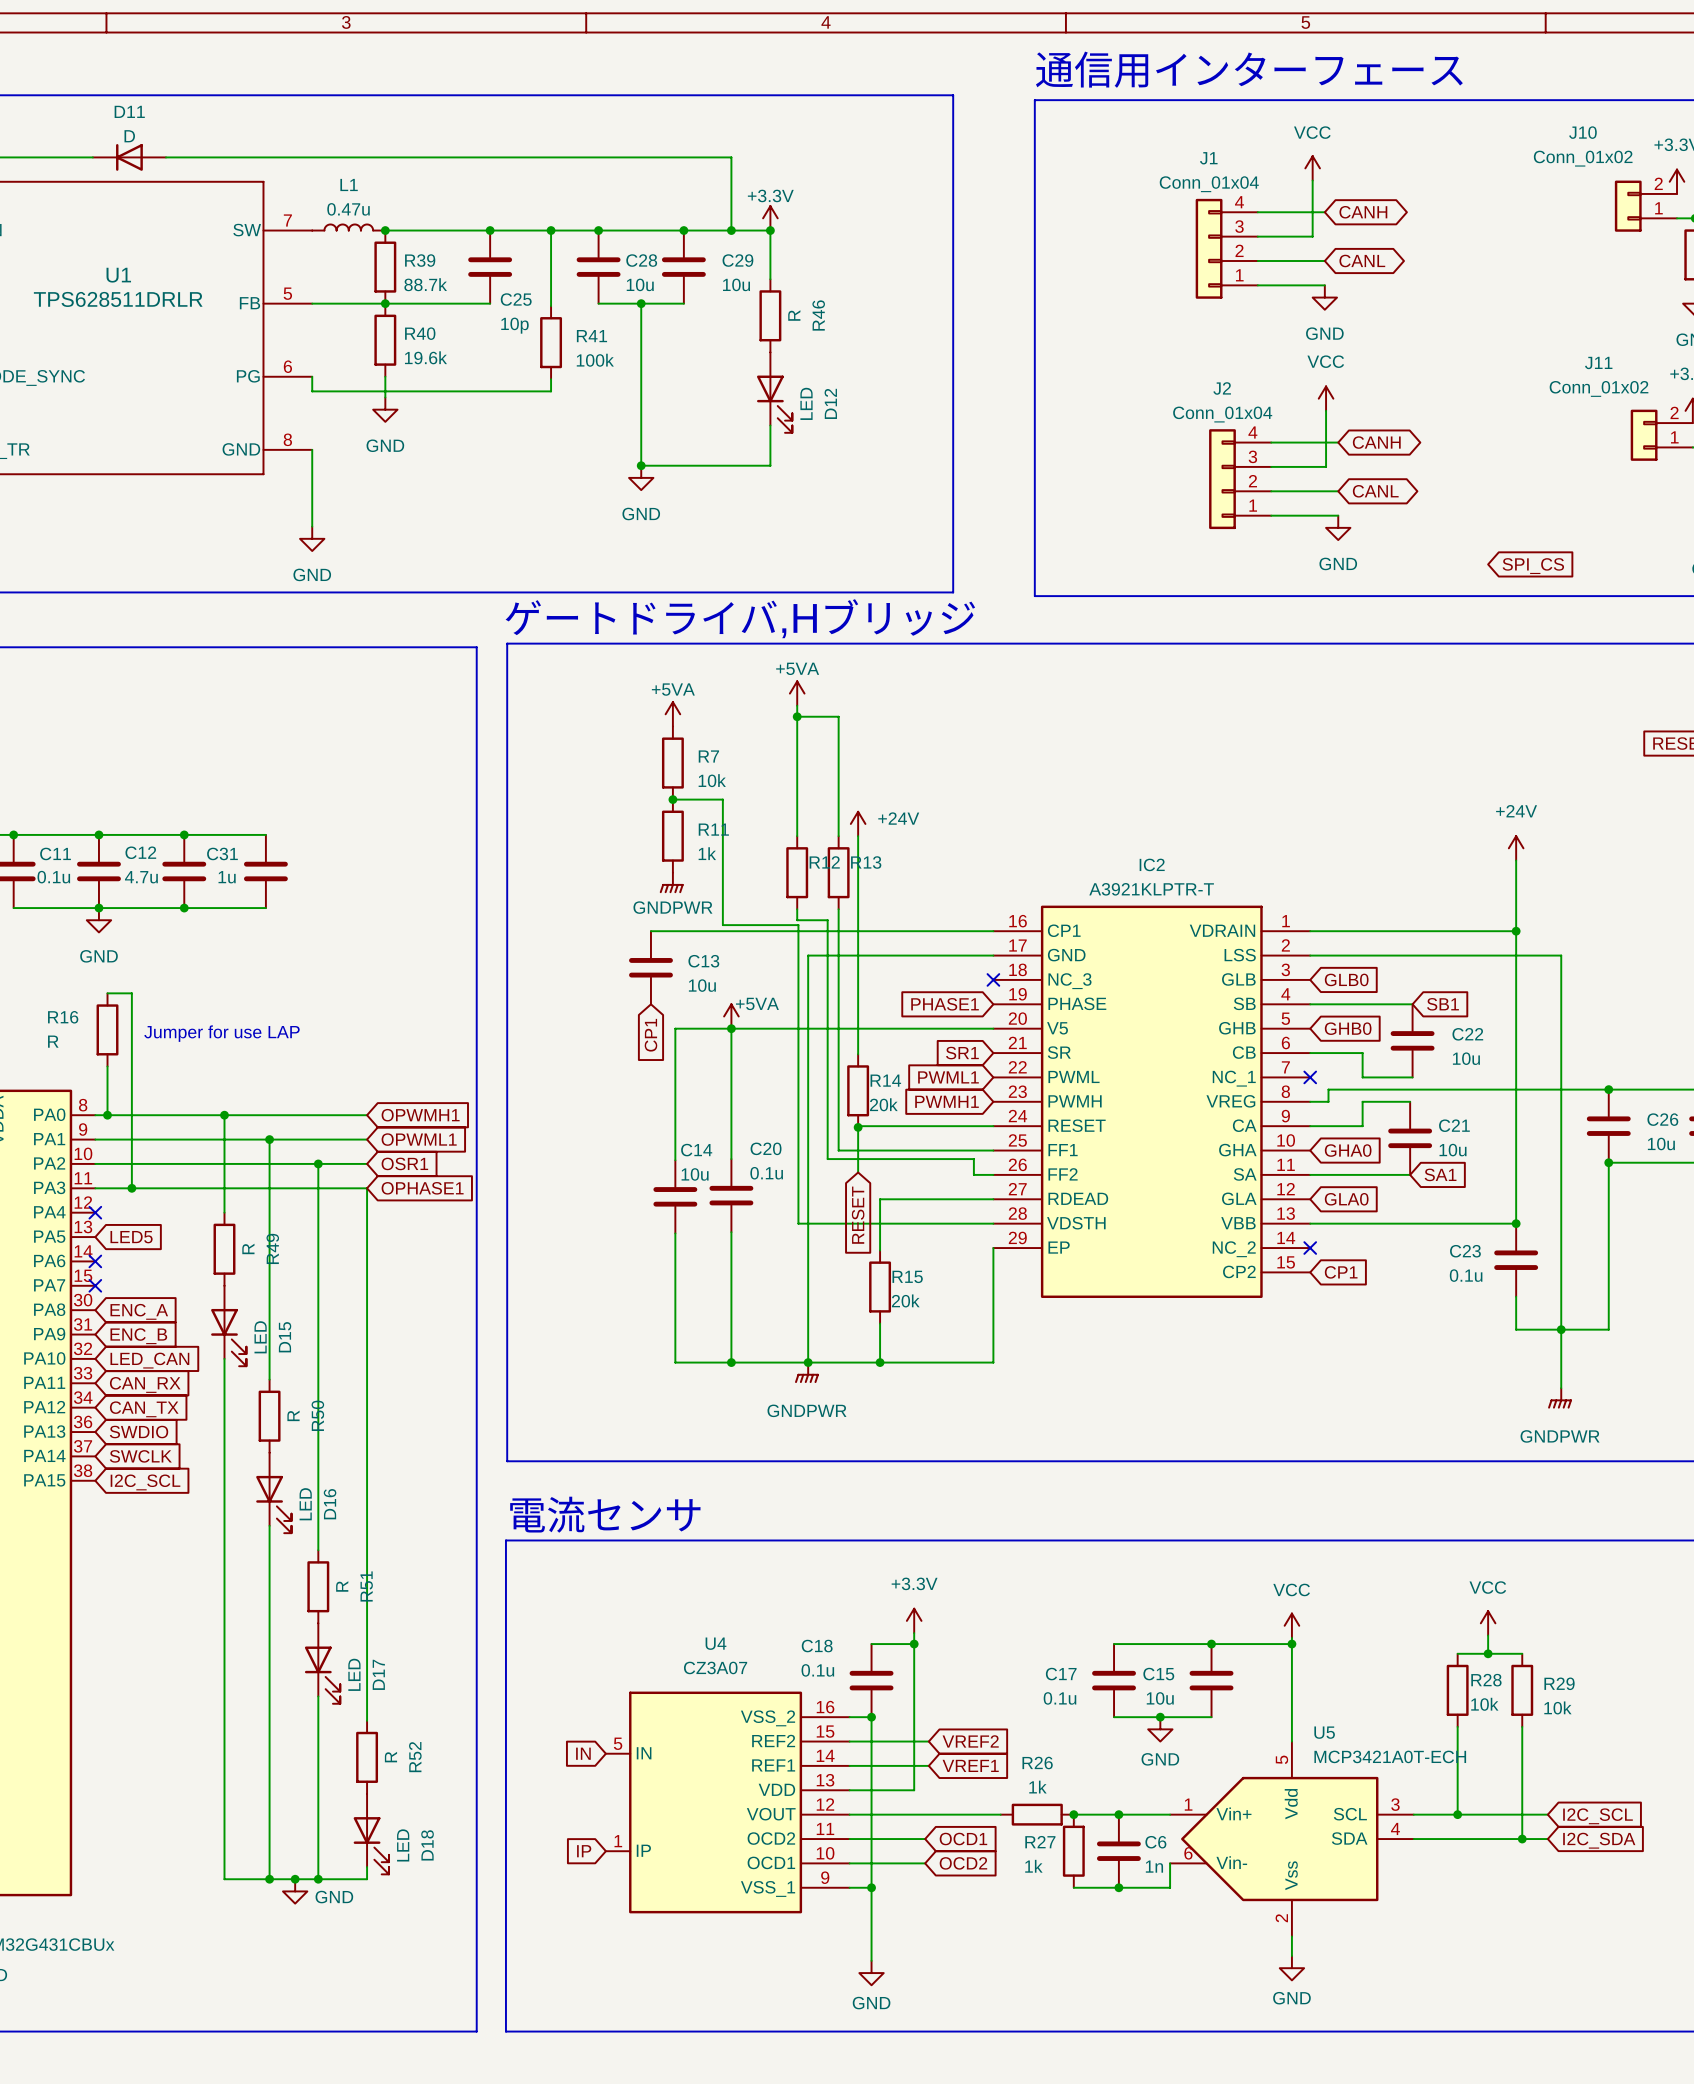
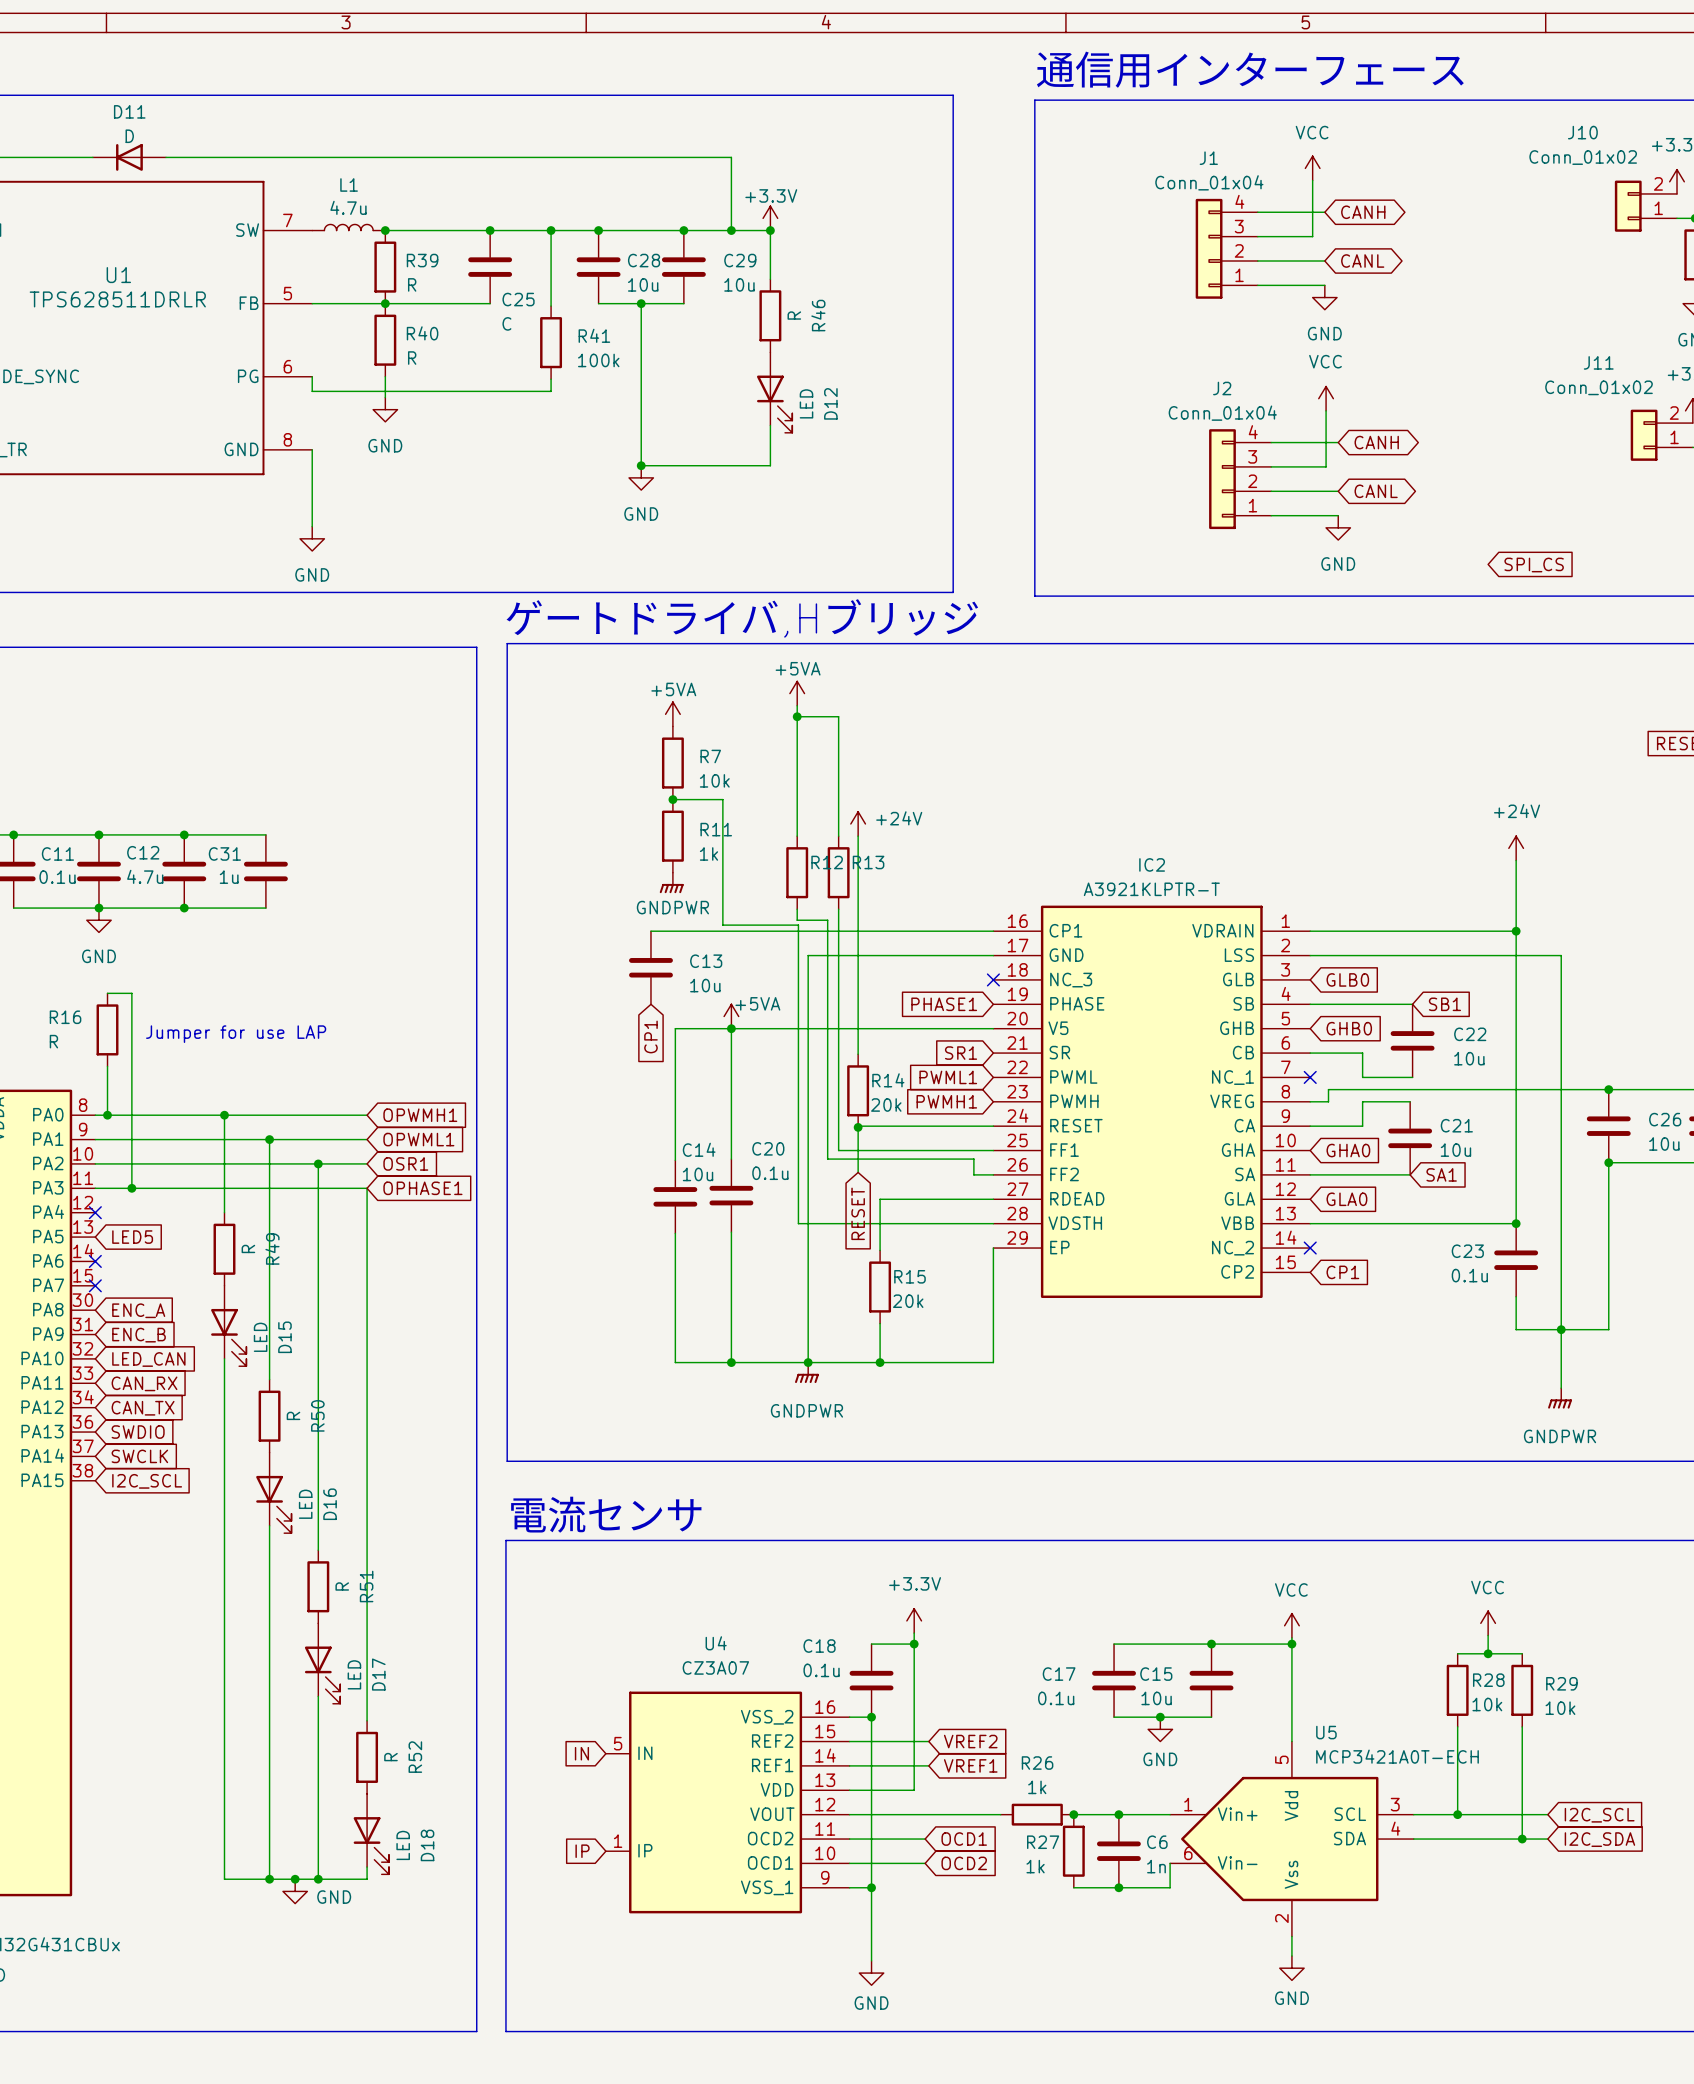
L1 value: 0.47u (348, 209) -> 4.7u (348, 207)
R39 value: 88.7k (425, 284) -> R (412, 284)
C25 value: 10p (514, 325) -> C (506, 323)
R40 value: 19.6k (425, 357) -> R (412, 358)

